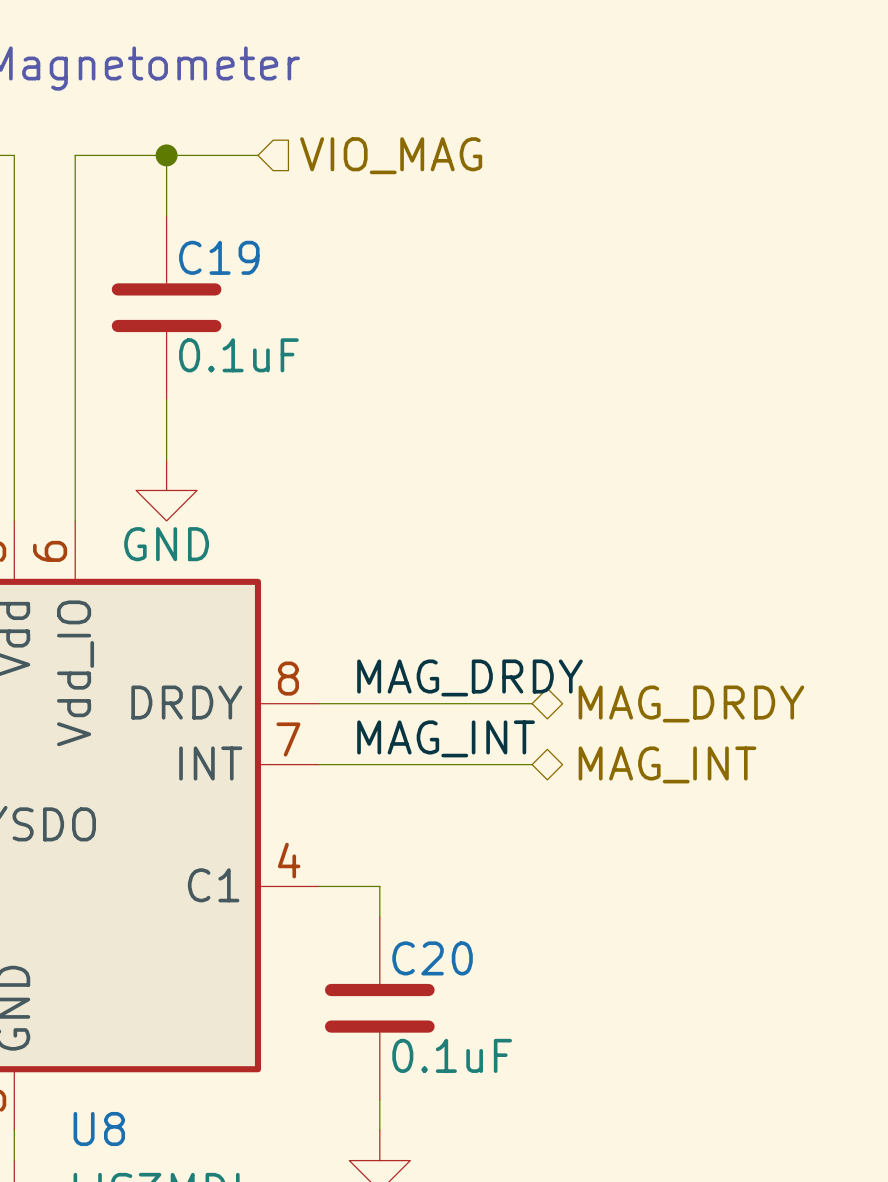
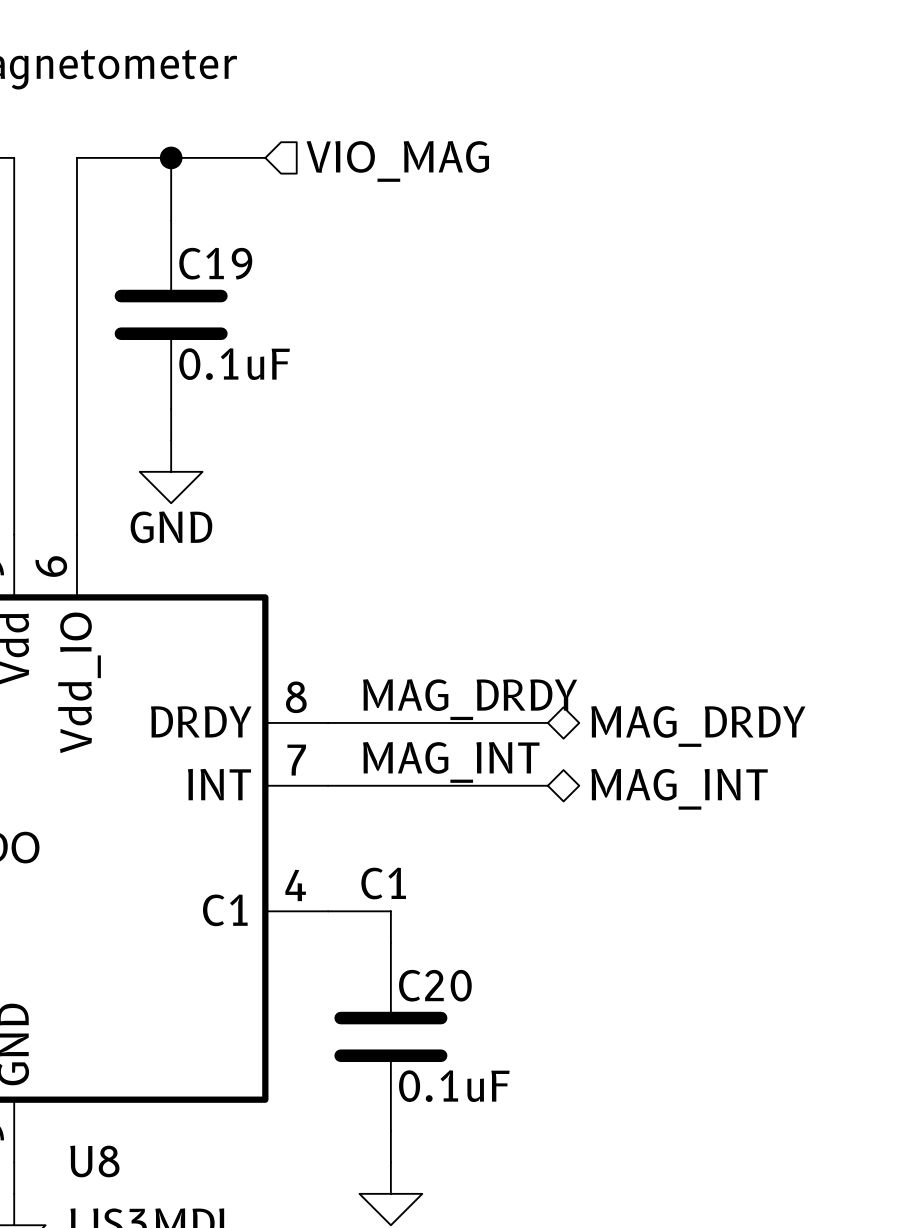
power symbol position: GND (166, 490) -> GND (171, 471)
label: none -> C1 (383, 883)

